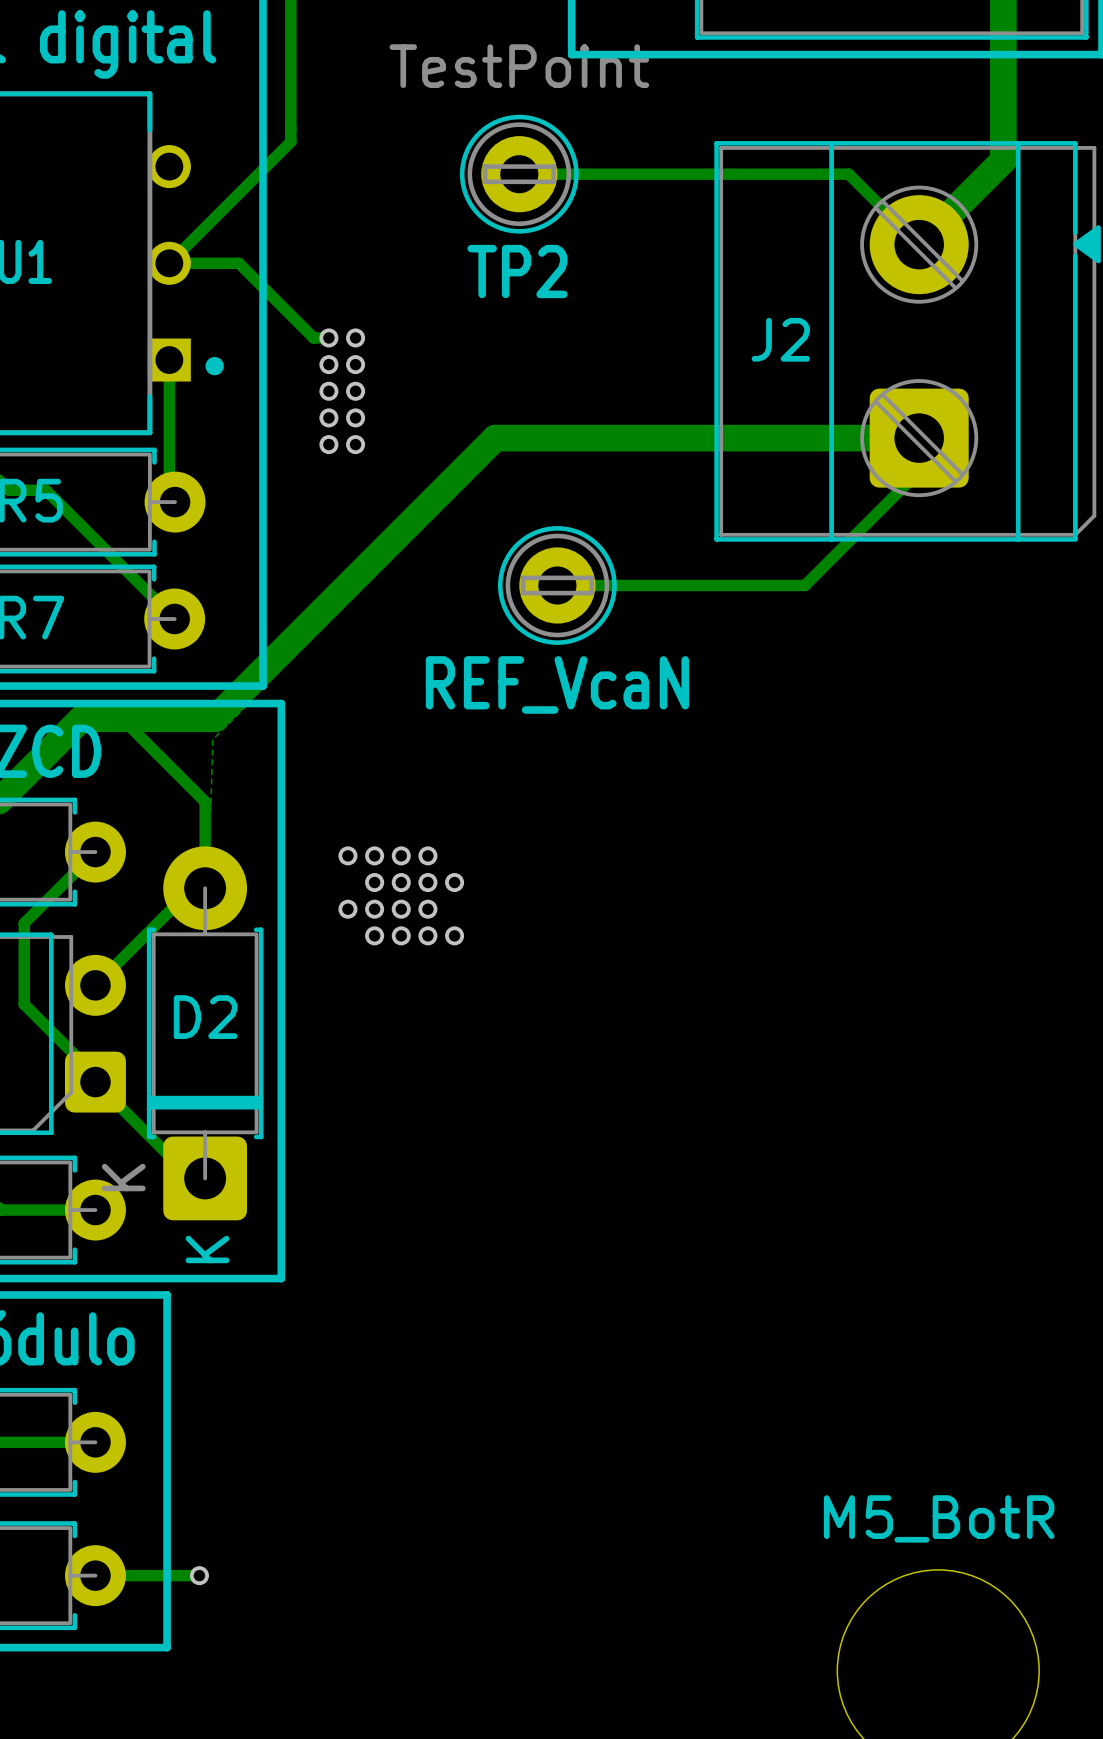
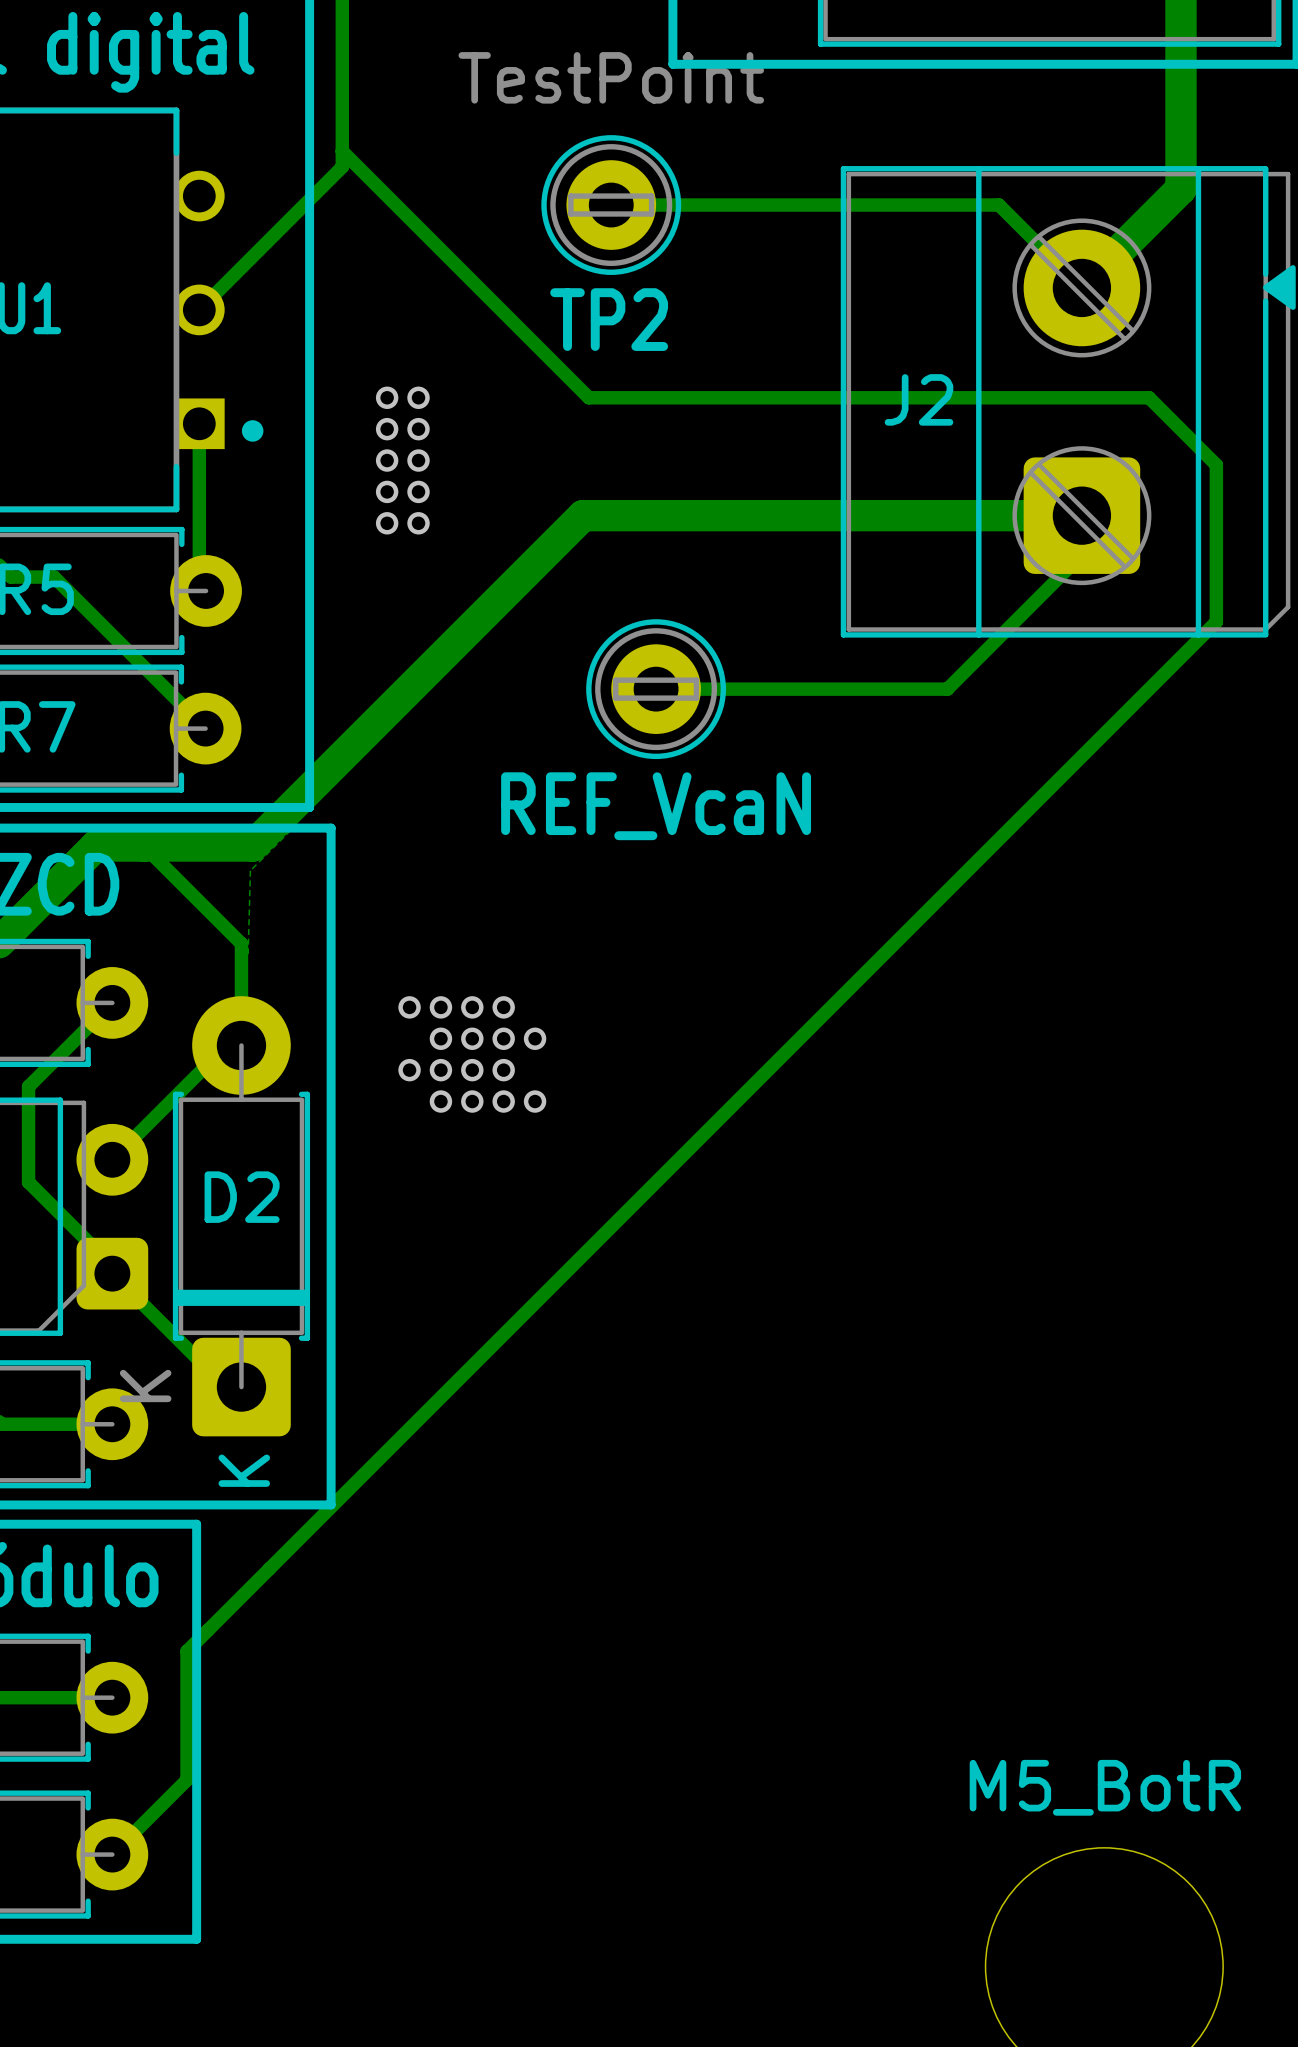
bottom track: (169, 263) (239, 263) (313, 337) (328, 337) -> none
bottom track: (95, 1575) (199, 1575) -> (112, 1854) (187, 1779) (187, 1651) (1216, 621) (1216, 465) (1149, 397) (588, 397) (342, 151)
via: (199, 1575) -> none

